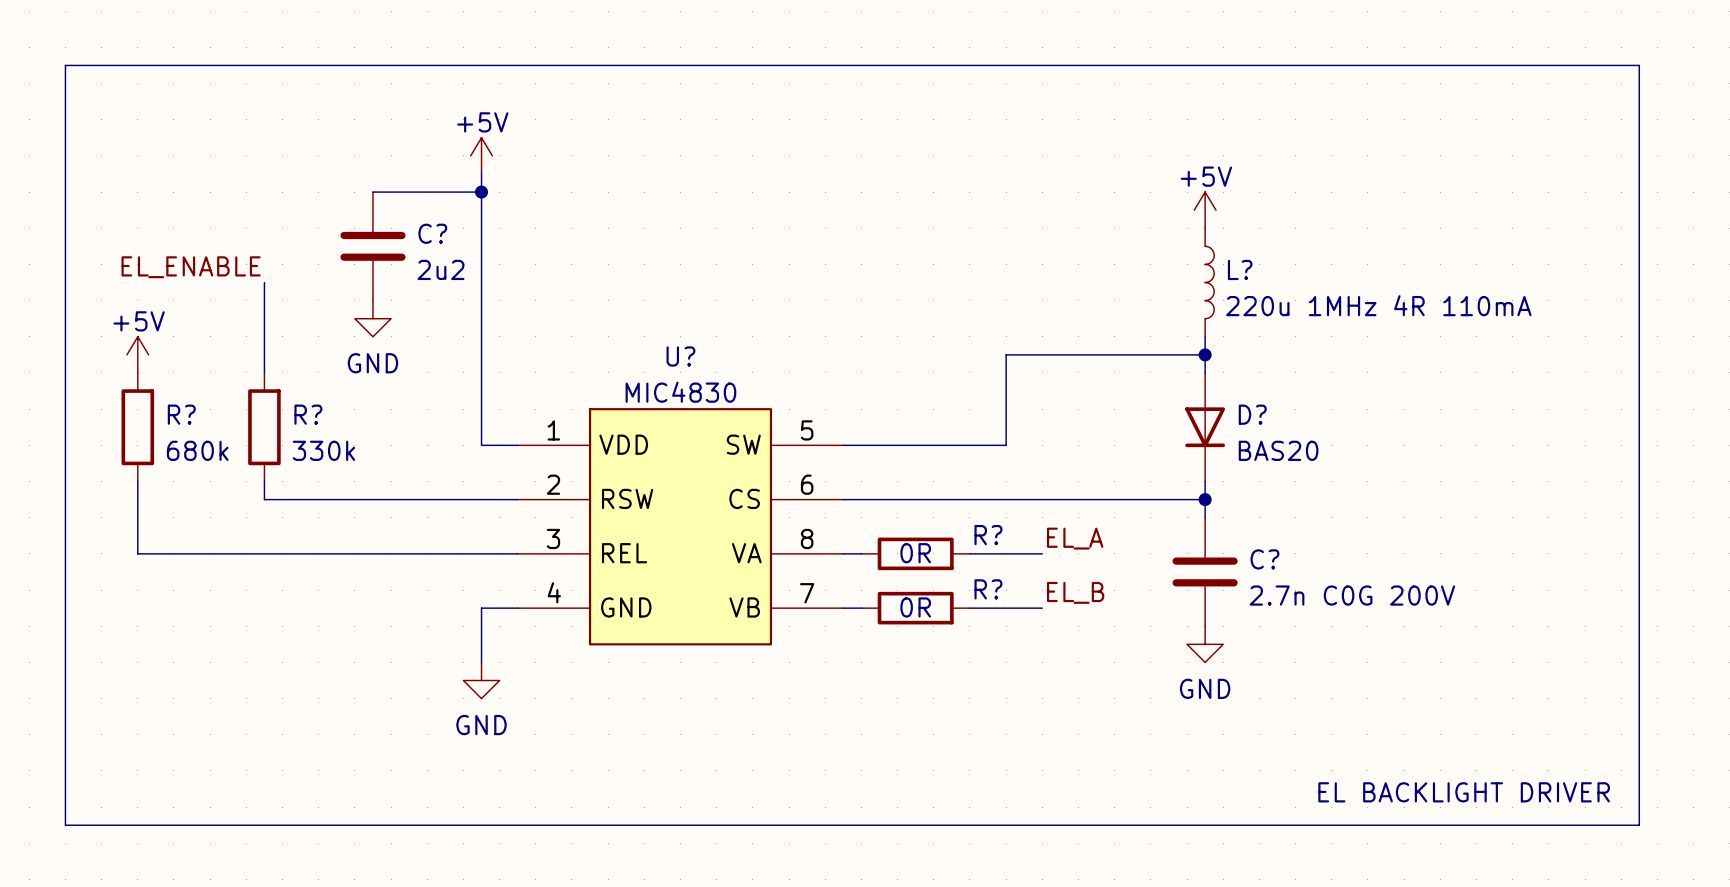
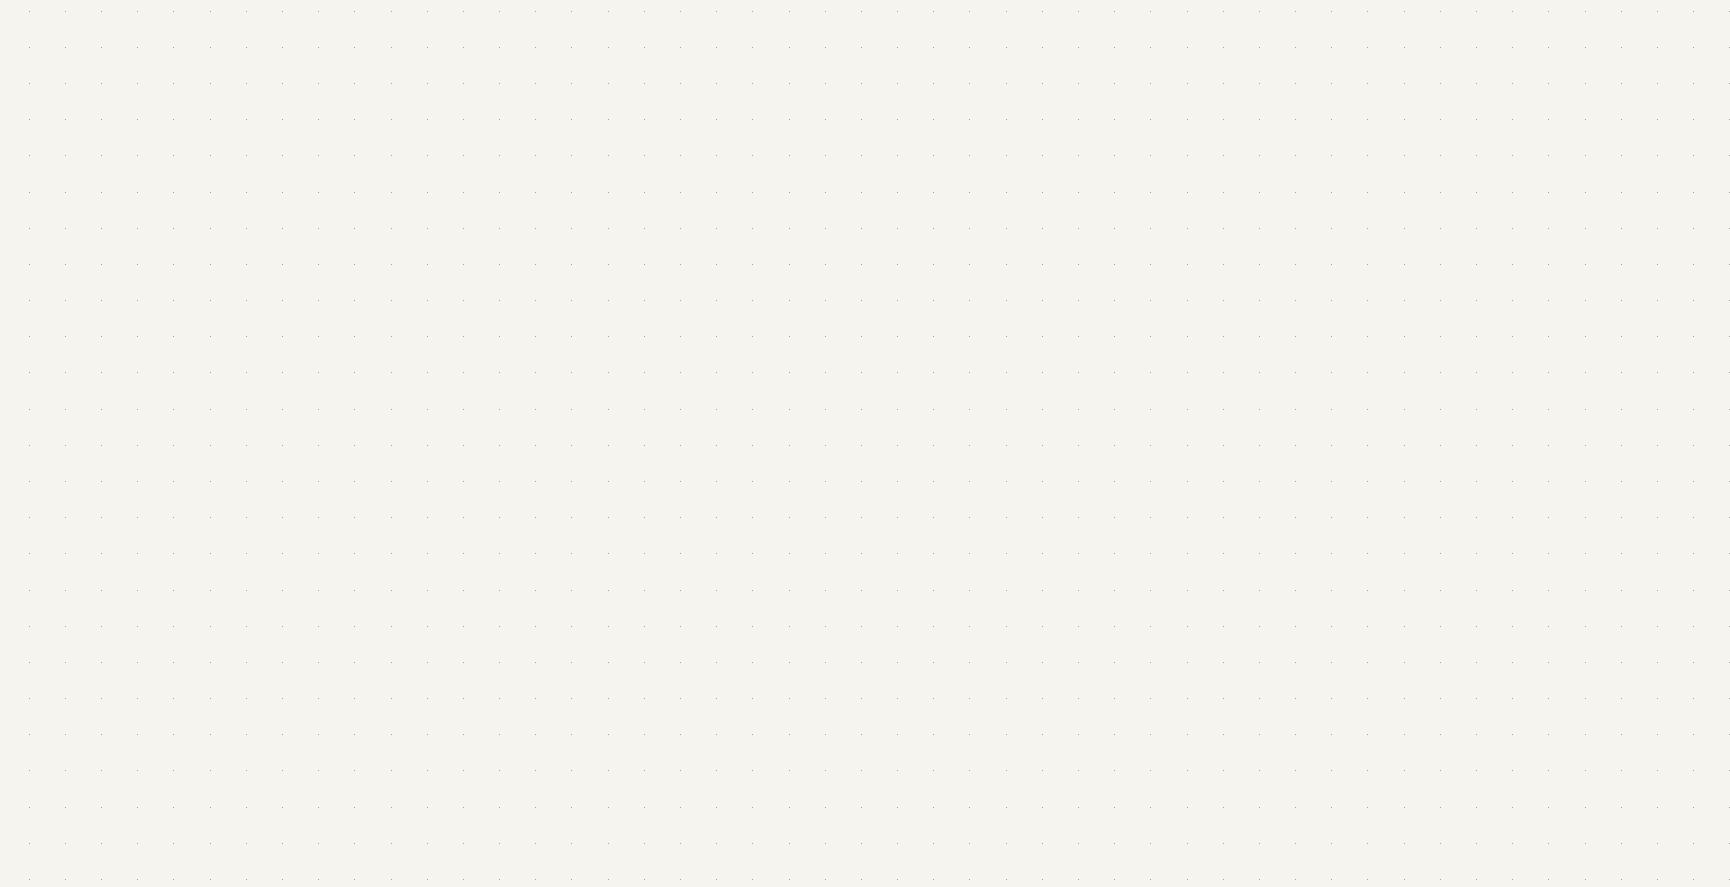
line: (65, 65) (1639, 65) (1639, 825) (65, 825) (65, 65) -> none
power symbol: +5V (481, 155) -> none
wire: (481, 173) (481, 445) (517, 445) -> none
wire: (372, 192) (481, 192) -> none
junction: (481, 192) -> none
power symbol: +5V (1205, 210) -> none
C?: 2u2 (372, 246) -> none
label: EL_ENABLE (191, 267) -> none
wire: (264, 282) (264, 372) -> none
L?: 220u 1MHz 4R 110mA (1209, 282) -> none
power symbol: GND (372, 318) -> none
wire: (1205, 336) (1205, 372) -> none
power symbol: +5V (137, 354) -> none
wire: (1205, 354) (1006, 354) (1006, 445) (843, 445) -> none
junction: (1205, 354) -> none
R?: 680k (137, 427) -> none
R?: 330k (264, 427) -> none
D?: BAS20 (1205, 427) -> none
wire: (137, 481) (137, 553) (517, 553) -> none
wire: (264, 481) (264, 499) (517, 499) -> none
wire: (1205, 481) (1205, 517) -> none
wire: (843, 499) (1205, 499) -> none
junction: (1205, 499) -> none
U?: MIC4830 (680, 526) -> none
label: EL_A (1075, 538) -> none
wire: (843, 553) (861, 553) -> none
R?: 0R (915, 553) -> none
wire: (969, 553) (1042, 553) -> none
C?: 2.7n C0G 200V (1205, 571) -> none
label: EL_B (1075, 592) -> none
wire: (517, 608) (481, 608) (481, 662) -> none
wire: (843, 608) (861, 608) -> none
R?: 0R (915, 608) -> none
wire: (969, 608) (1042, 608) -> none
power symbol: GND (1205, 644) -> none
power symbol: GND (481, 680) -> none
text: EL BACKLIGHT DRIVER (1464, 792) -> none

